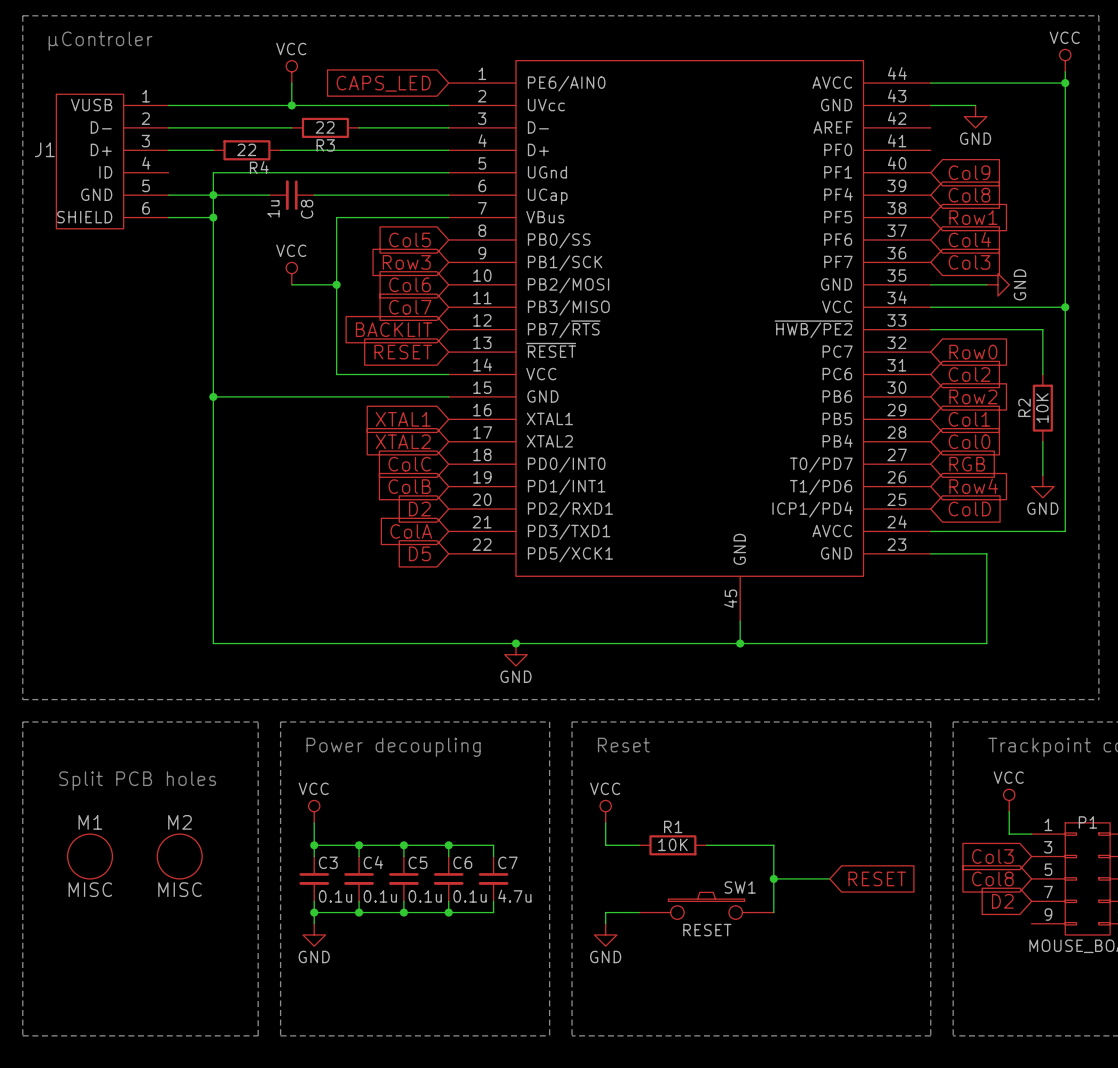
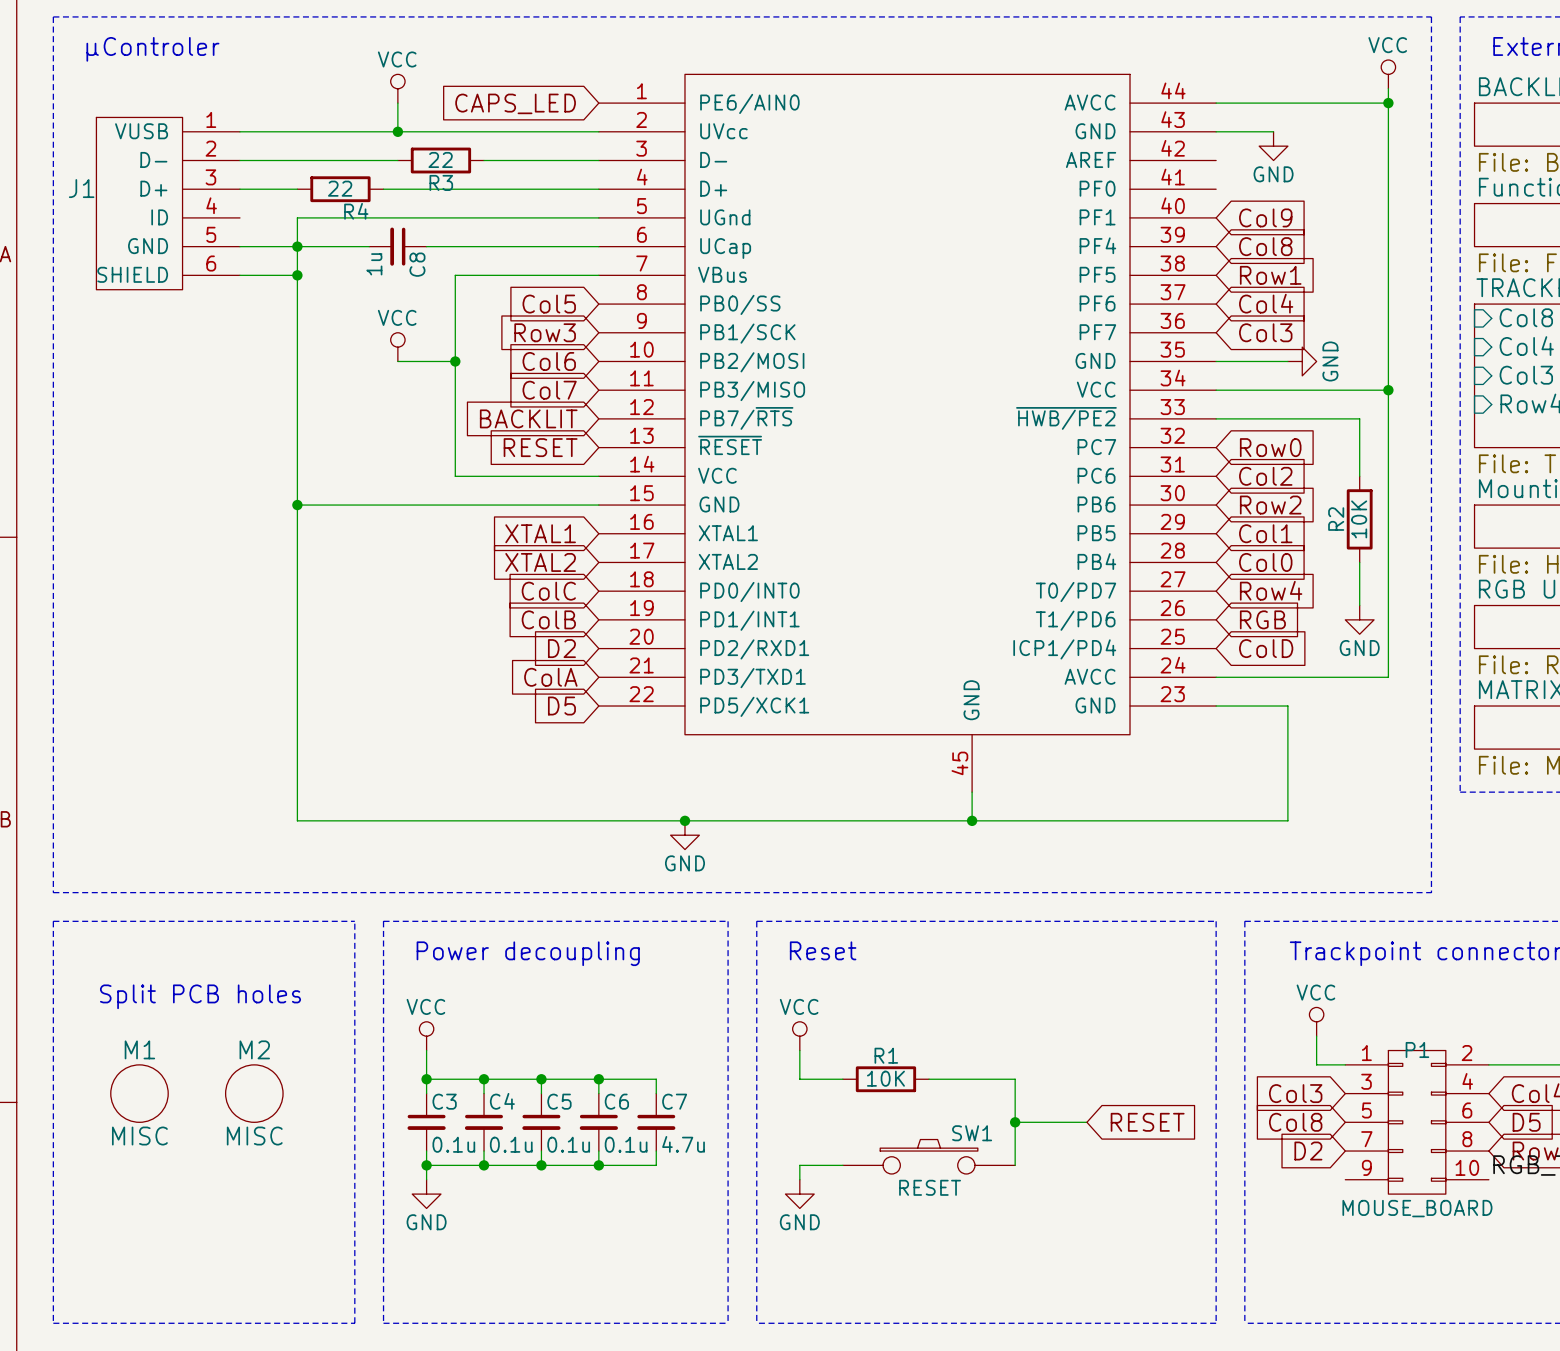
global label: RGB (967, 464) -> Row4 (1271, 590)
global label: Row4 (973, 486) -> RGB (1262, 619)

